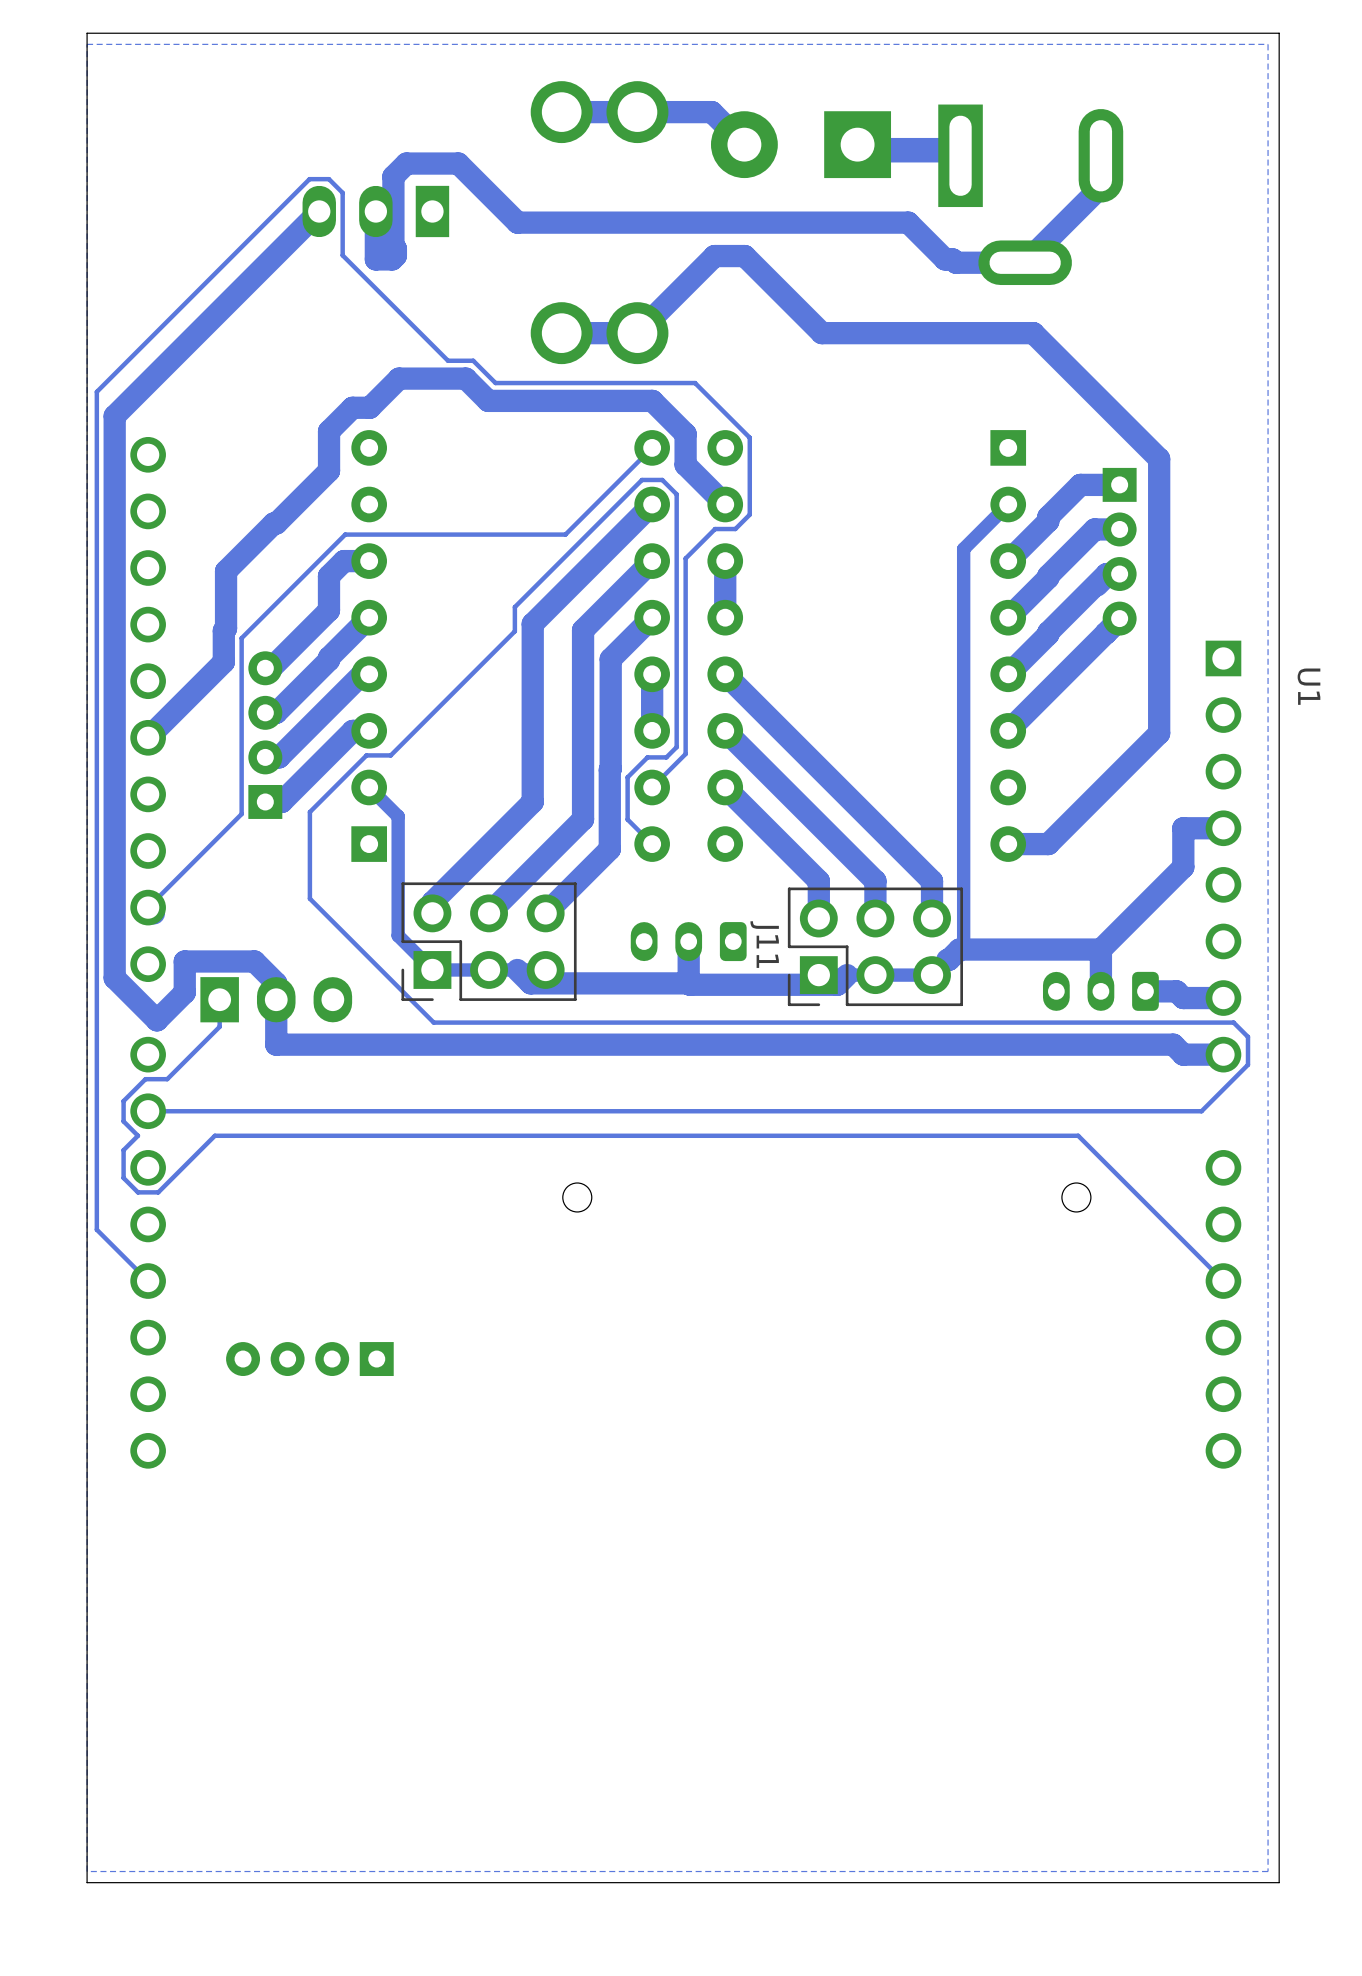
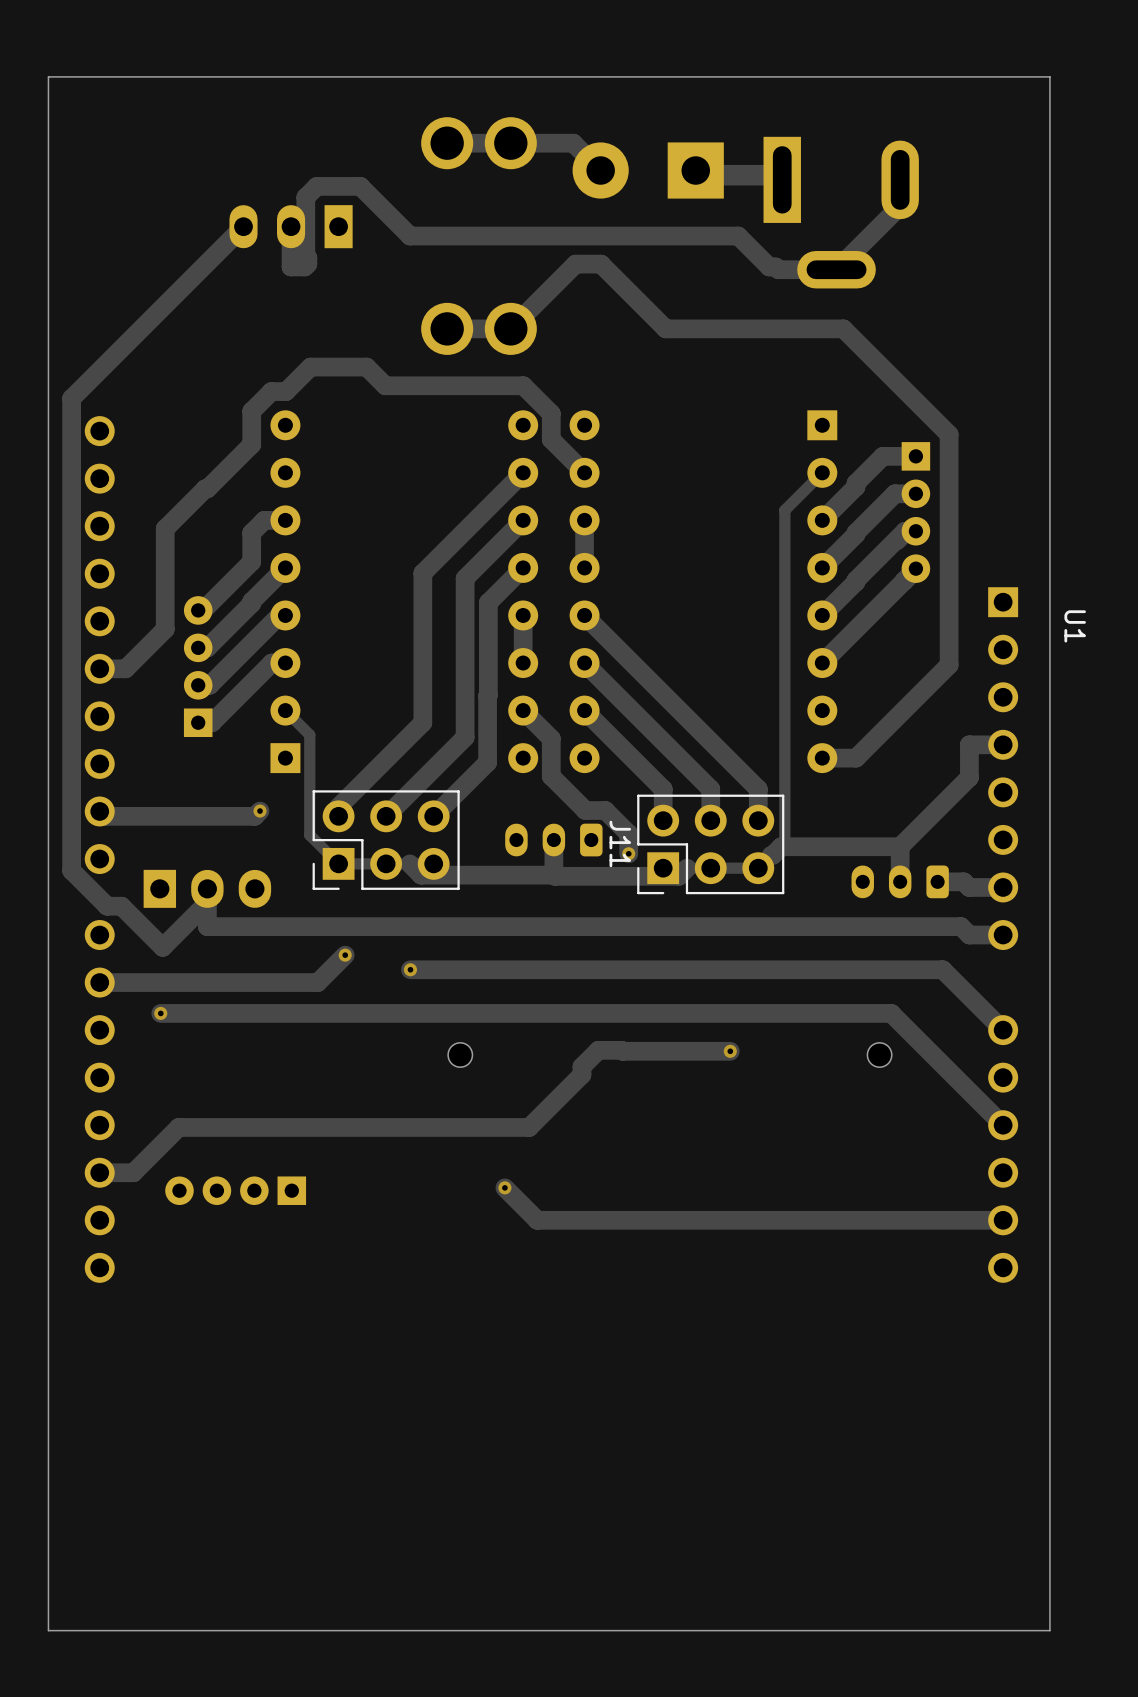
zone outline: (1268, 44) (87, 44) (87, 1871) (1268, 1871) (1268, 44) -> none
track: (652, 447) (565, 534) (345, 534) (241, 638) (241, 814) (148, 907) -> none
track: (226, 628) (223, 630) (223, 662) (148, 737) -> (165, 577) (165, 629) (125, 668) (99, 668)
track: (652, 787) (685, 753) (685, 558) (715, 529) (735, 529) (749, 514) (749, 437) (695, 383) (495, 383) (473, 360) (448, 360) (342, 255) (342, 192) (328, 179) (309, 179) (96, 391) (96, 1229) (148, 1281) -> (523, 710) (551, 738) (551, 776) (585, 810) (605, 810) (628, 833) (628, 853)
track: (652, 844) (627, 819) (627, 777) (647, 757) (666, 757) (676, 747) (676, 494) (662, 479) (641, 479) (514, 607) (514, 631) (390, 755) (366, 755) (309, 812) (309, 898) (433, 1022) (1233, 1022) (1248, 1036) (1248, 1064) (1201, 1111) (407, 1111) -> (345, 955) (317, 982)
track: none -> (260, 811) (254, 816) (104, 816)
via: none -> (260, 811)
via: none -> (628, 853)
track: (219, 999) (219, 1026) (167, 1079) (145, 1079) (123, 1101) (123, 1121) (137, 1135) (123, 1150) (123, 1178) (137, 1192) (158, 1192) (214, 1135) (1078, 1135) (1090, 1147) -> (160, 1013) (891, 1013)
track: (276, 999) (276, 983) (254, 961) (184, 961) (184, 992) (157, 1020) -> (207, 902) (162, 947) (121, 906) (107, 906)
via: none -> (345, 955)
track: none -> (410, 969) (942, 969) (1003, 1030)
via: none -> (410, 969)
track width: thin (407, 1111) (148, 1111) -> thick (317, 982) (99, 982)
via: none -> (160, 1013)
track width: thin (1090, 1147) (1223, 1281) -> thick (891, 1013) (1003, 1125)
track: none -> (730, 1051) (598, 1050) (581, 1066) (581, 1074) (529, 1127) (178, 1127) (133, 1172) (99, 1172)
via: none -> (730, 1051)
track: none -> (504, 1187) (537, 1220) (1003, 1220)
via: none -> (504, 1187)

